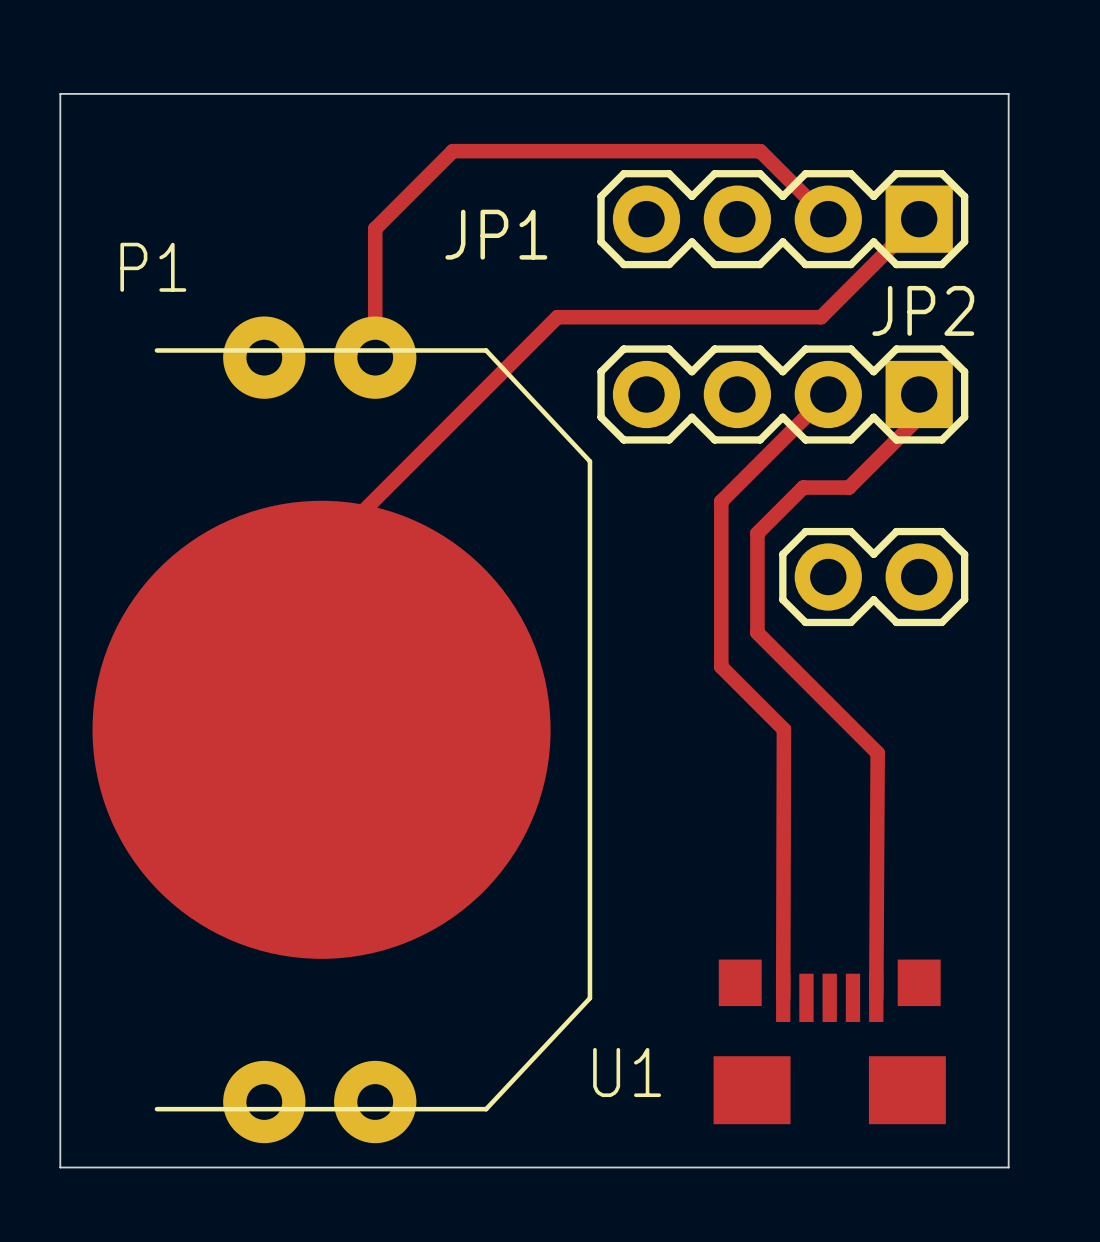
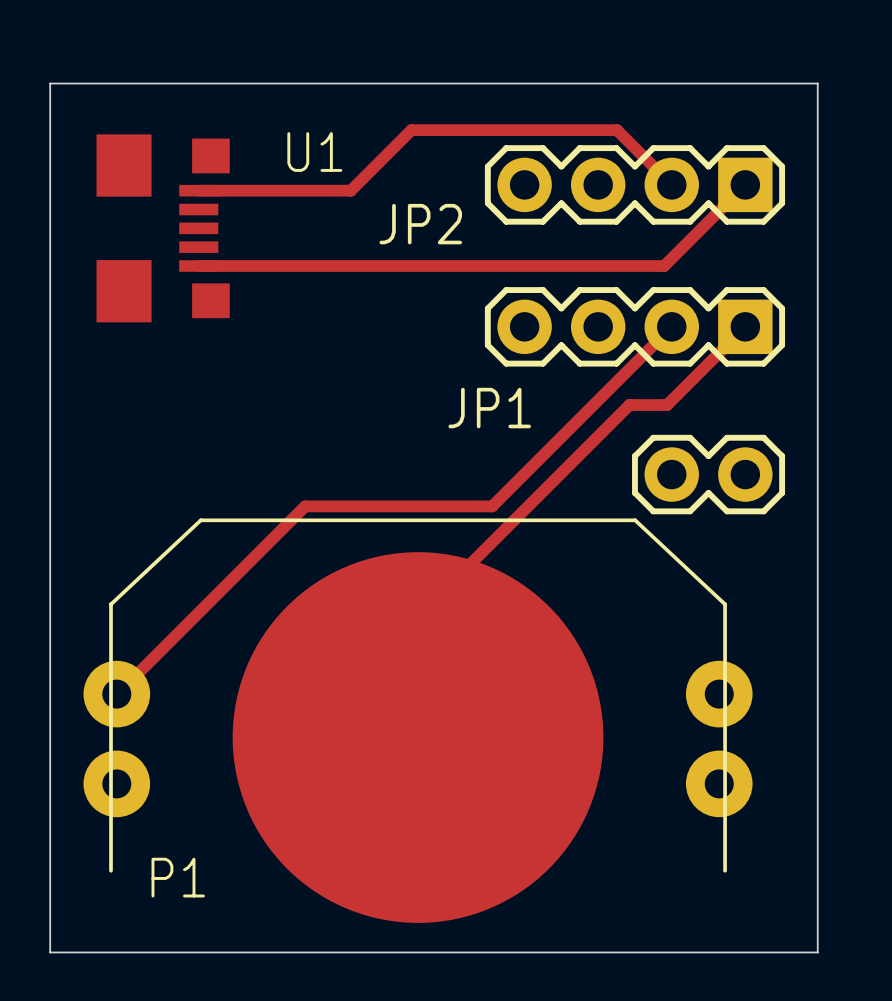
track: (760, 151) (452, 151) (375, 228) (375, 357) -> (617, 130) (411, 130) (350, 190) (198, 190)
JP1 name: JP1 (496, 234) -> JP2 (420, 224)
P1 name position: P1 (153, 267) -> P1 (178, 877)
JP2 name: JP2 (923, 310) -> JP1 (489, 408)
track: (821, 317) (557, 317) (321, 553) (321, 729) -> (665, 264) (664, 266) (198, 266)
track: (919, 394) (919, 417) (849, 487) (803, 487) (757, 533) (757, 632) (877, 753) (876, 997) -> (745, 326) (667, 405) (629, 405) (418, 616) (418, 737)
track: (721, 501) (721, 666) (783, 729) (783, 997) -> (585, 413) (492, 506) (305, 506) (117, 694)
P1 rotation: 0° (342, 729) -> 90° counterclockwise (418, 720)
U1 rotation: 0° (829, 1041) -> 90° clockwise (163, 228)
U1 position: (829, 1041) -> (163, 228)
U1 name position: U1 (627, 1072) -> U1 (314, 152)

